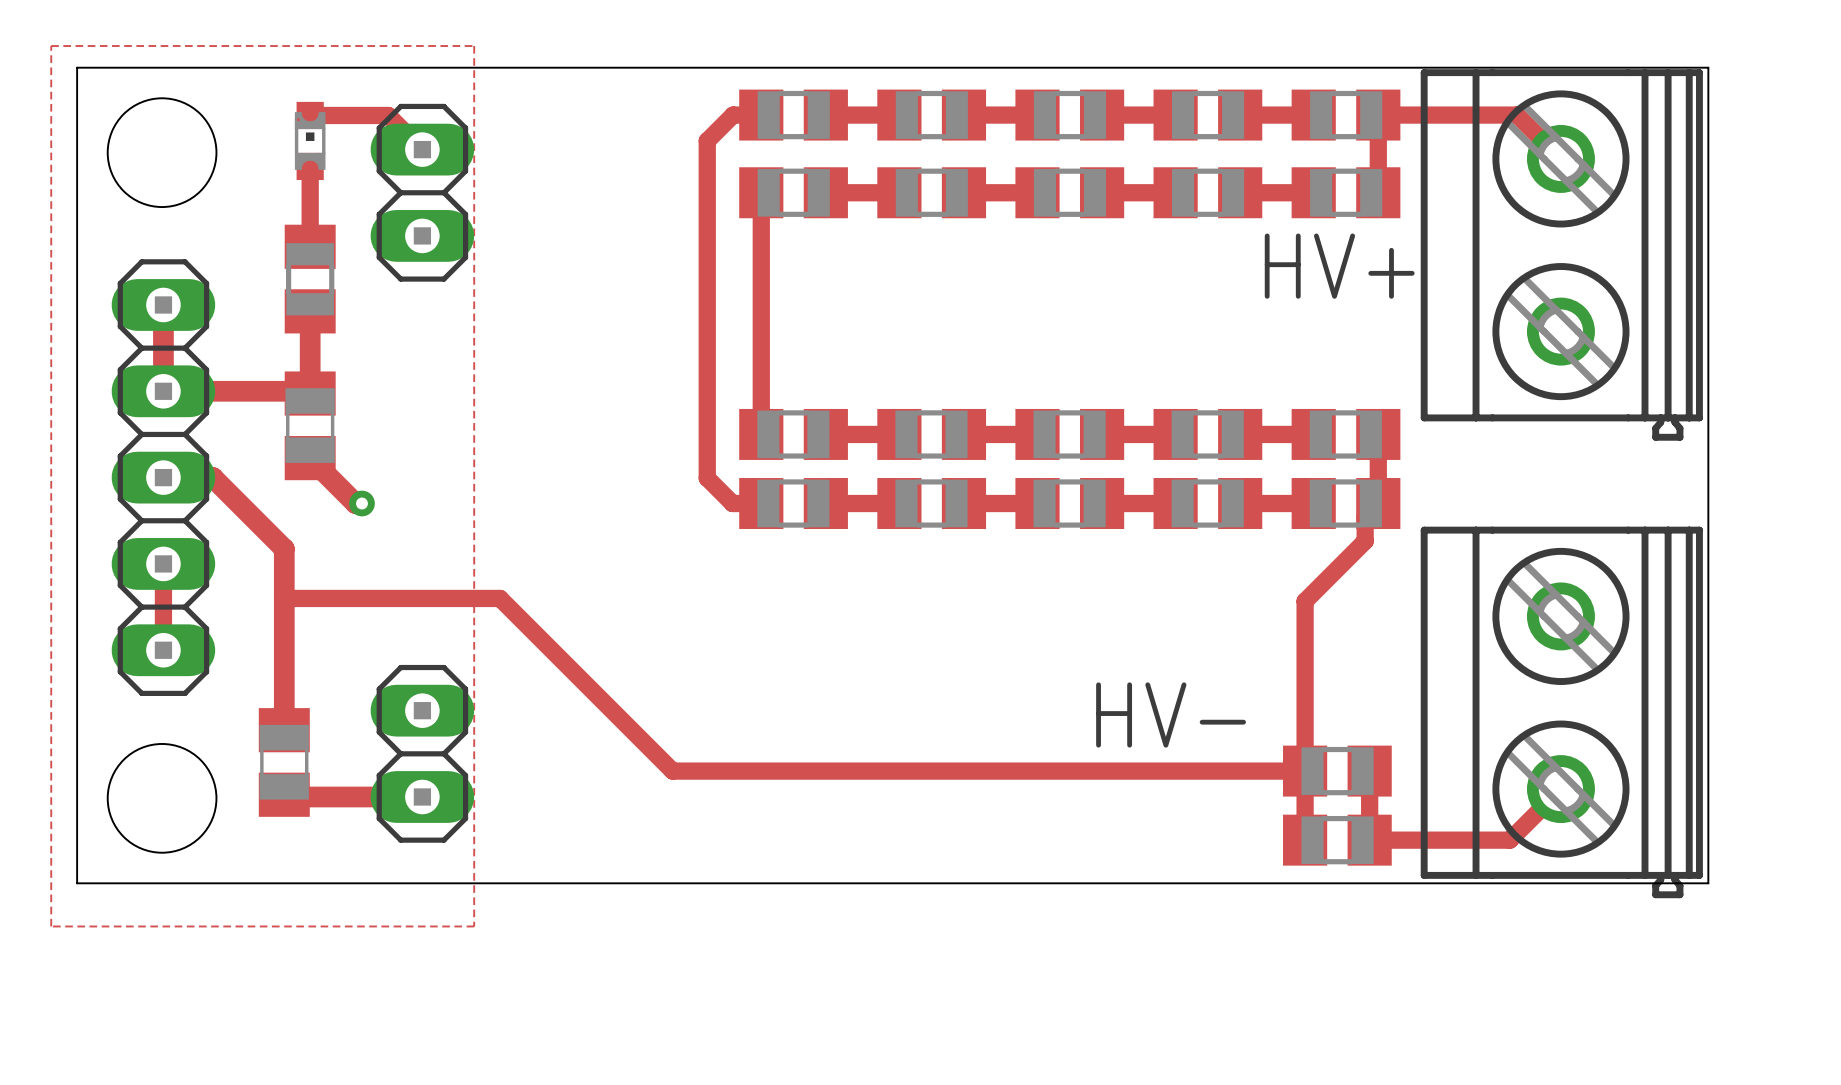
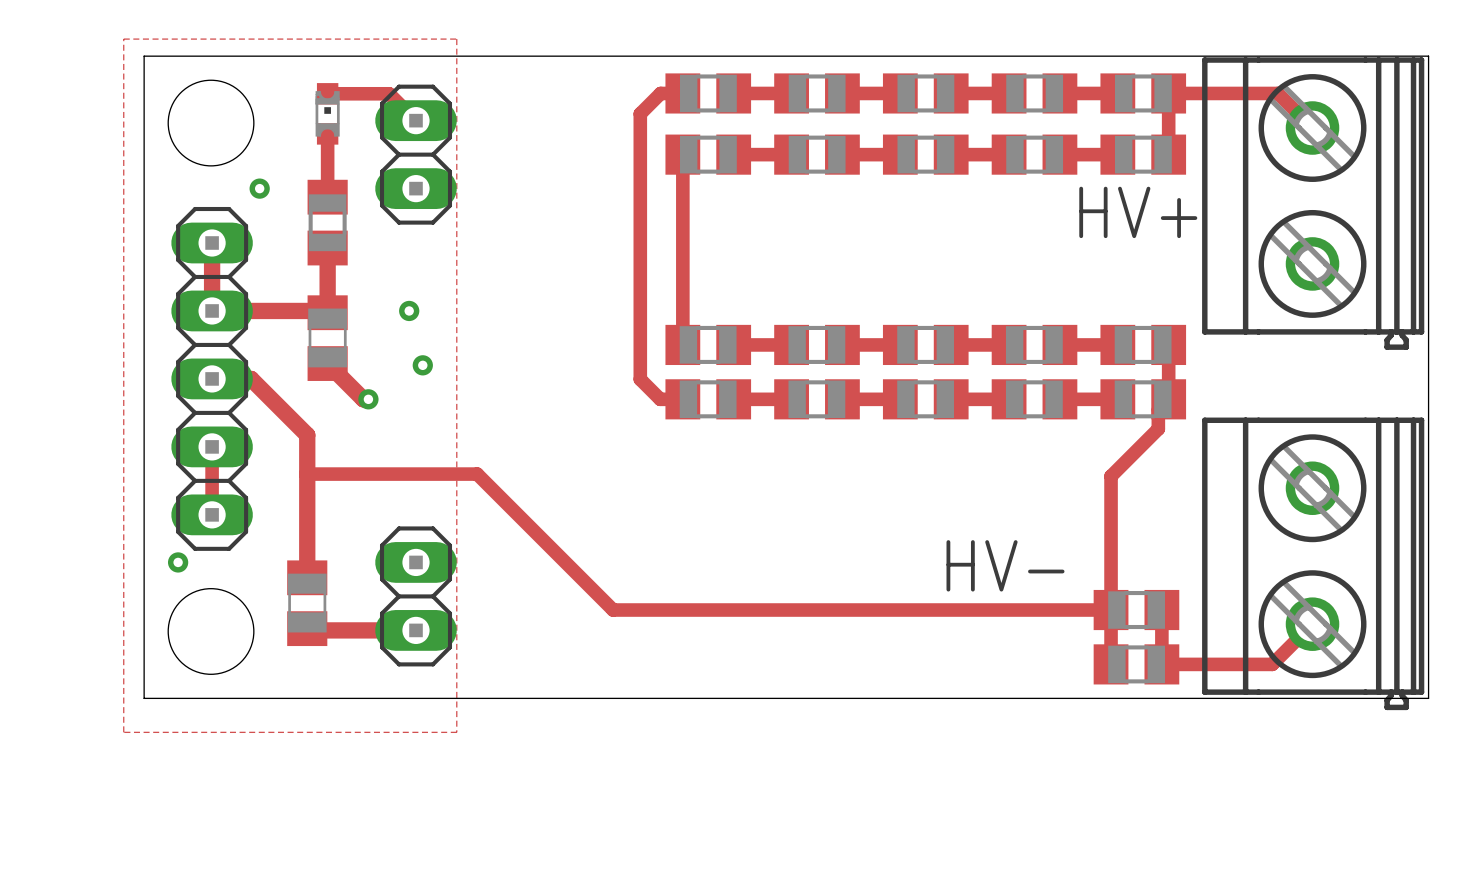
via: none -> (259, 188)
via: none -> (409, 310)
via: none -> (422, 365)
via: none -> (178, 562)

